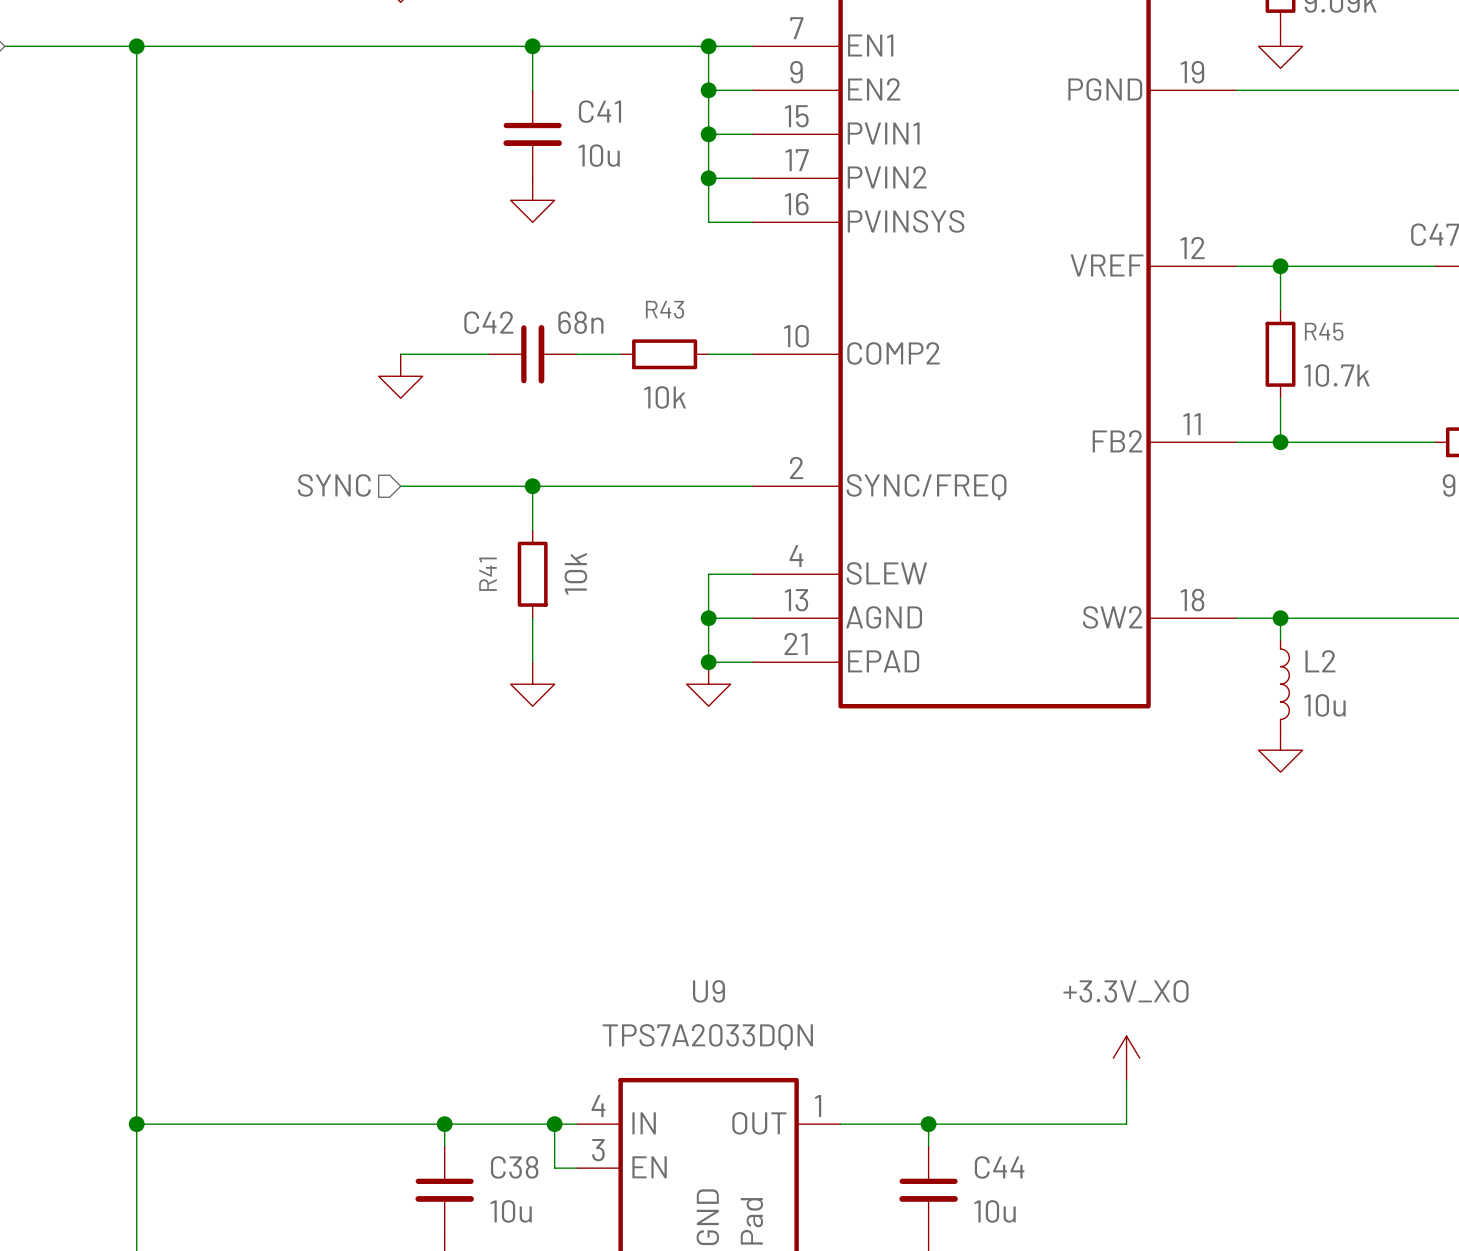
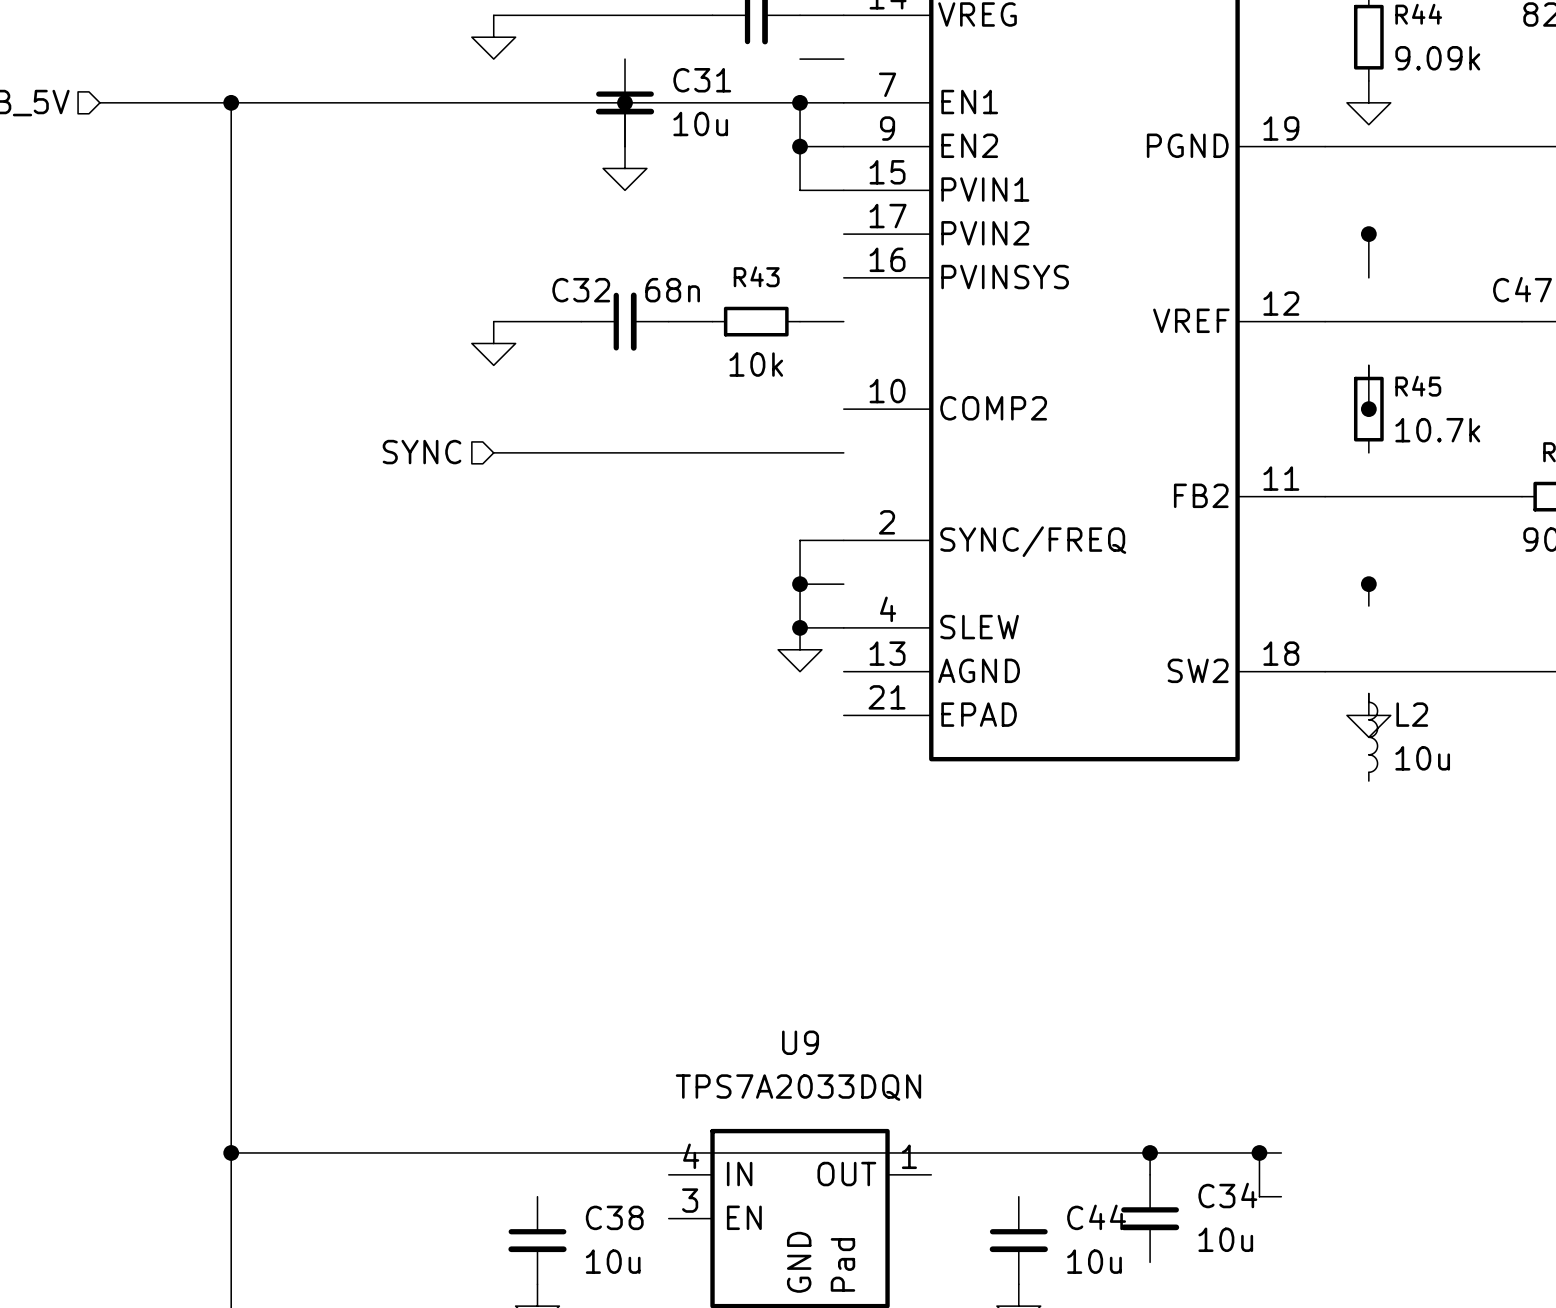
C31: none -> 10u (625, 102)
power symbol: none -> (625, 168)
C41: 10u (532, 134) -> none
wire: (708, 134) (708, 222) (752, 222) -> none
junction: (708, 134) -> none
wire: (708, 178) (752, 178) -> (800, 59) (843, 59)
junction: (708, 178) -> none
junction: none -> (1368, 234)
power symbol: (532, 200) -> none
C32: none -> 68n (625, 321)
wire: (1280, 266) (1280, 310) -> (1368, 409) (1368, 365)
junction: (1280, 266) -> none
power symbol: none -> (493, 343)
wire: (400, 354) (488, 354) -> (493, 321) (581, 321)
C42: 68n (532, 354) -> none
wire: (576, 354) (620, 354) -> (668, 321) (712, 321)
R43 position: (664, 354) -> (756, 321)
wire: (708, 354) (752, 354) -> (800, 321) (843, 321)
junction: none -> (1368, 409)
power symbol: (400, 376) -> none
wire: none -> (493, 452) (843, 452)
wire: (1280, 398) (1280, 442) -> (1368, 234) (1368, 277)
junction: (1280, 442) -> none
hierarchical label position: SYNC (334, 485) -> SYNC (422, 452)
wire: (400, 486) (708, 486) -> none
wire: (532, 486) (532, 530) -> none
junction: (532, 486) -> none
junction: none -> (800, 584)
junction: none -> (1368, 584)
R41: 10k (532, 574) -> none
wire: (708, 574) (708, 662) (752, 662) -> (800, 627) (800, 540)
junction: none -> (800, 627)
wire: (532, 618) (532, 662) -> none
wire: (708, 618) (752, 618) -> (800, 584) (843, 584)
junction: (708, 618) -> none
wire: (1280, 618) (1280, 640) -> (1368, 584) (1368, 606)
junction: (1280, 618) -> none
junction: (708, 662) -> none
power symbol: (532, 684) -> none
power symbol position: (708, 684) -> (800, 649)
power symbol position: (1280, 750) -> (1368, 715)
power symbol: +3.3V_XO (1126, 1058) -> none
wire: (1126, 1080) (1126, 1124) (840, 1124) -> none
wire: none -> (231, 1152) (1281, 1152)
junction: none -> (1150, 1152)
wire: none -> (1259, 1152) (1259, 1196) (1281, 1196)
junction: none -> (1259, 1152)
wire: (136, 1124) (576, 1124) -> none
junction position: (136, 1124) -> (231, 1152)
wire: (444, 1124) (444, 1146) -> none
junction: (444, 1124) -> none
wire: (554, 1124) (554, 1168) (576, 1168) -> none
junction: (554, 1124) -> none
wire: (928, 1124) (928, 1146) -> (1150, 1152) (1150, 1174)
junction: (928, 1124) -> none
C34: none -> 10u (1150, 1218)

